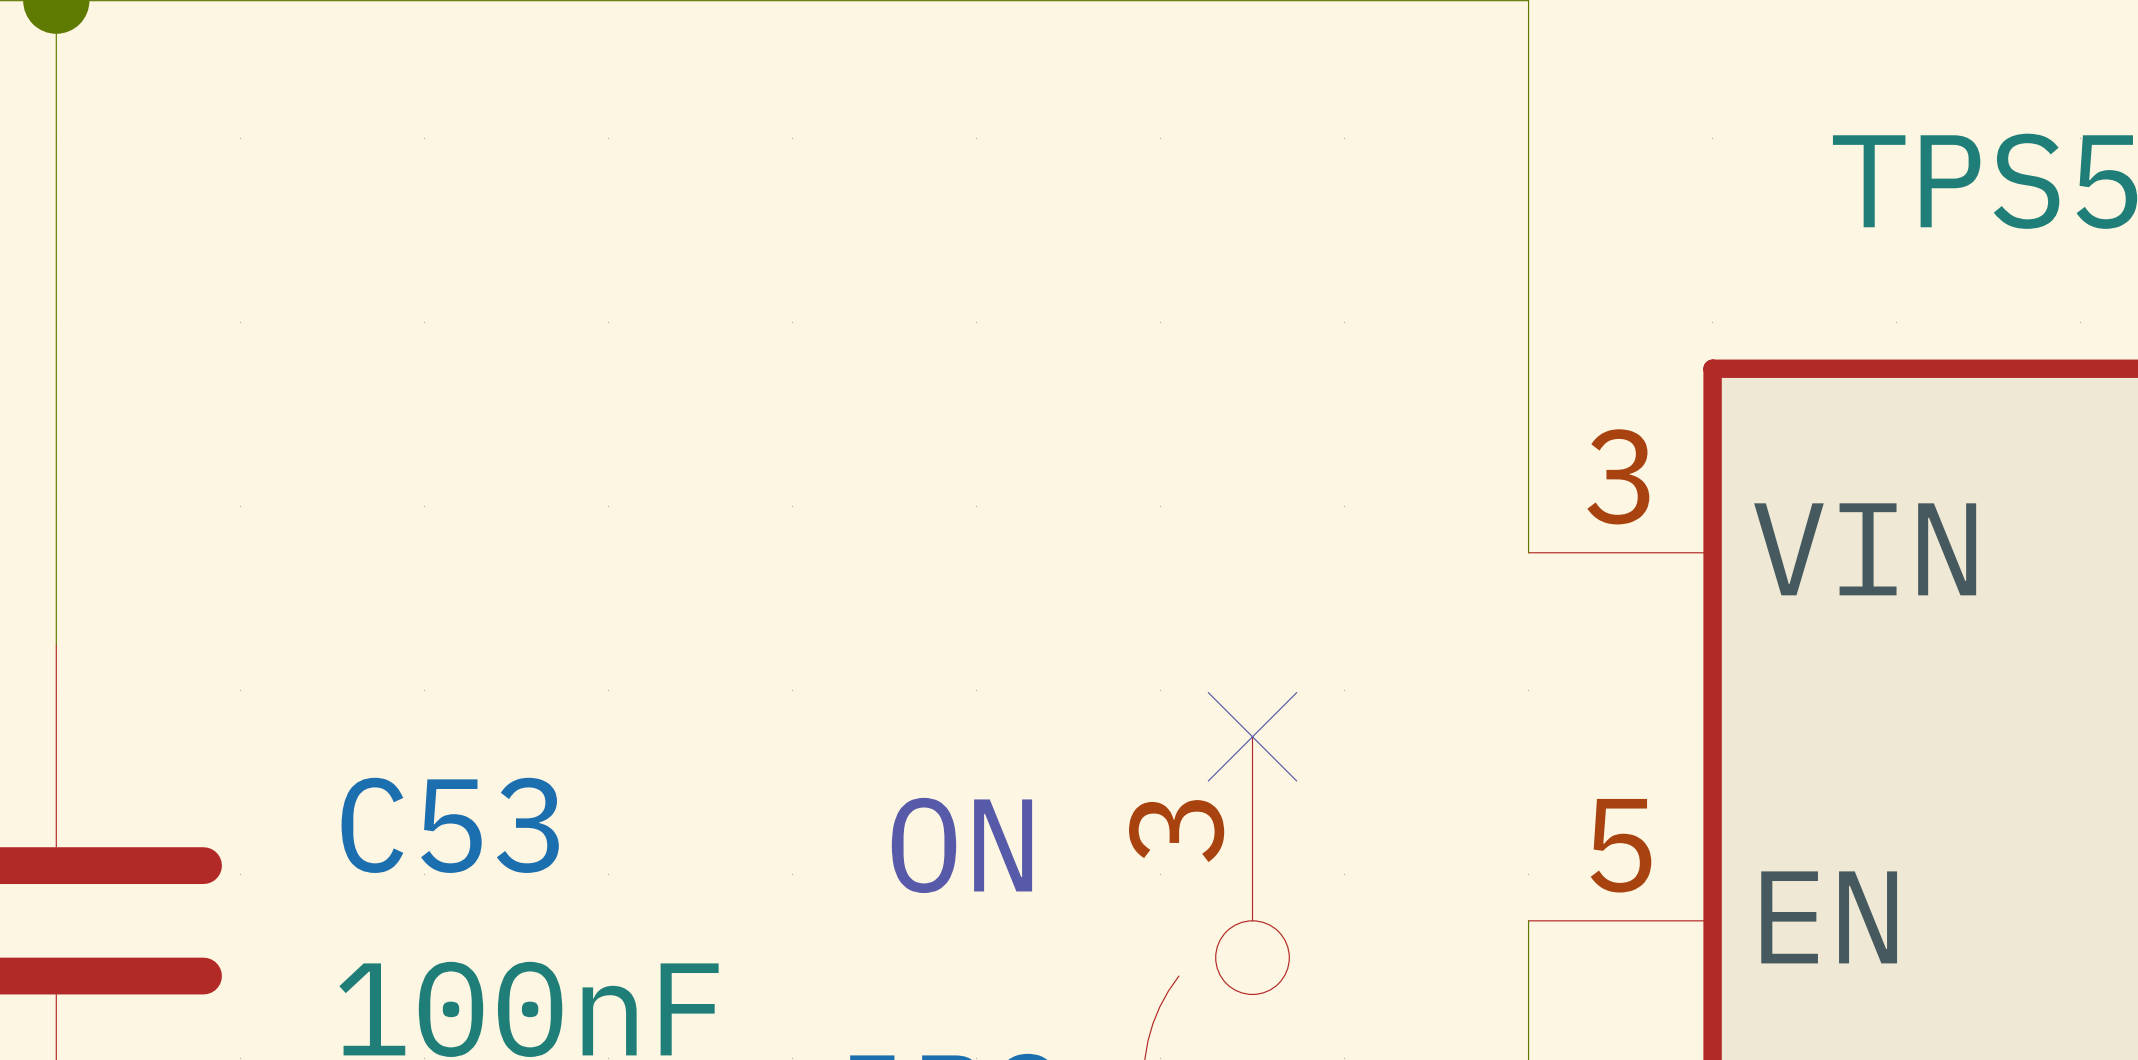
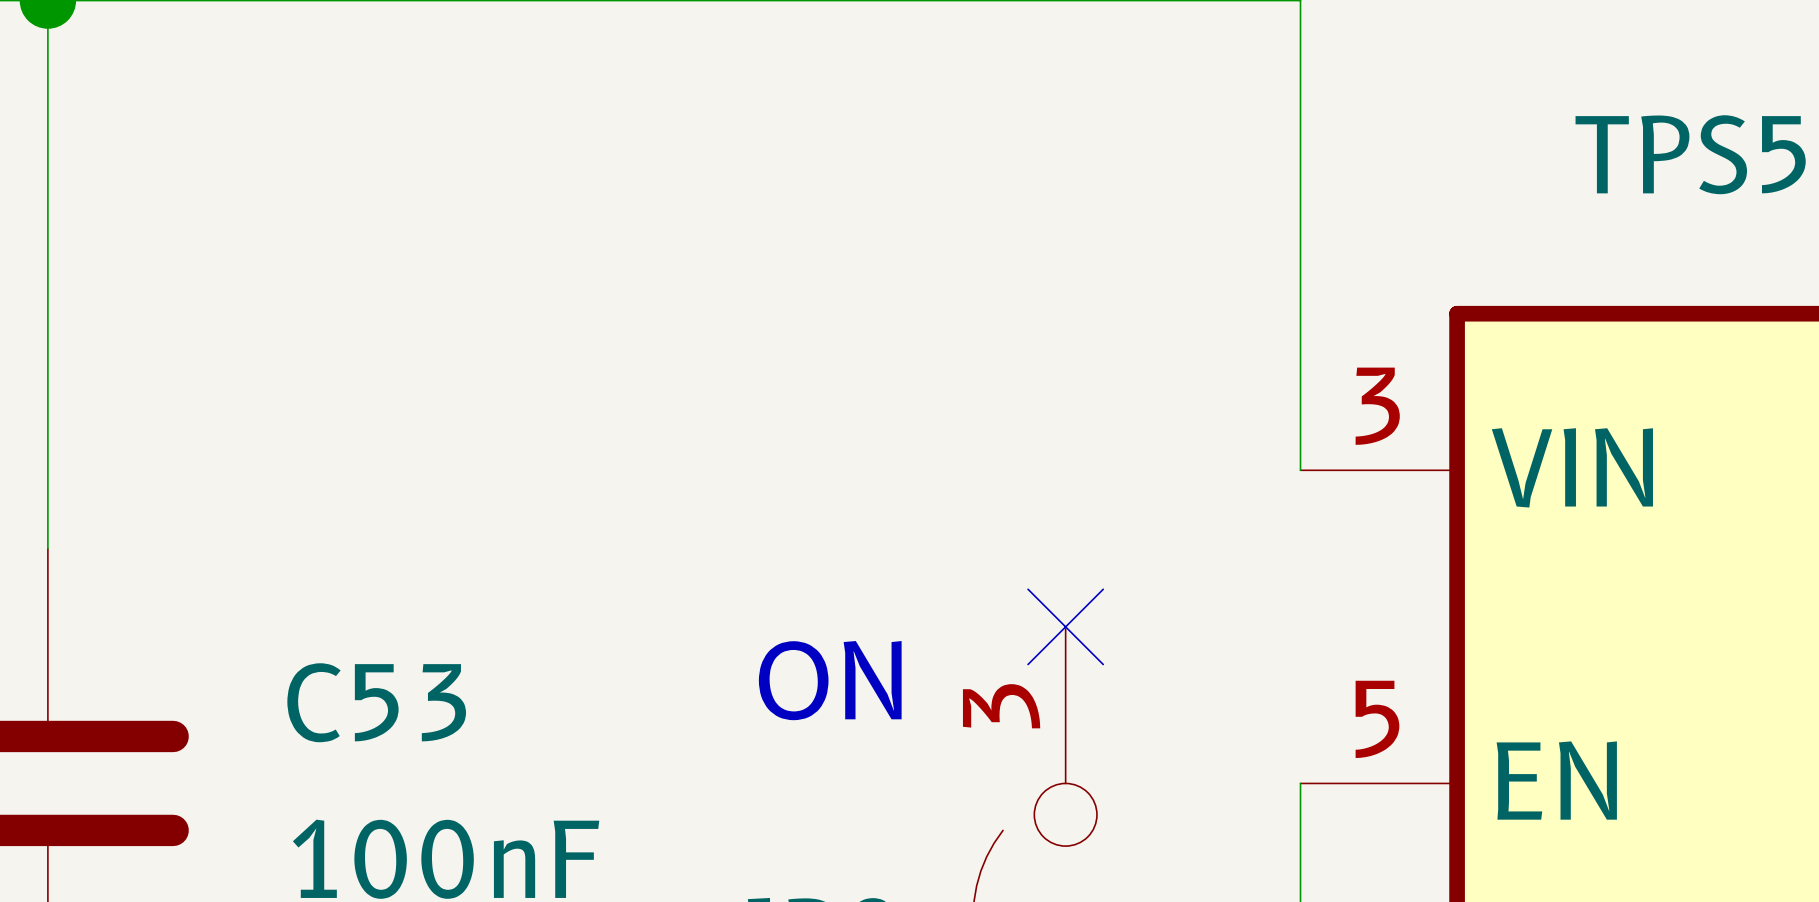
text position: ON (961, 845) -> ON (830, 680)

